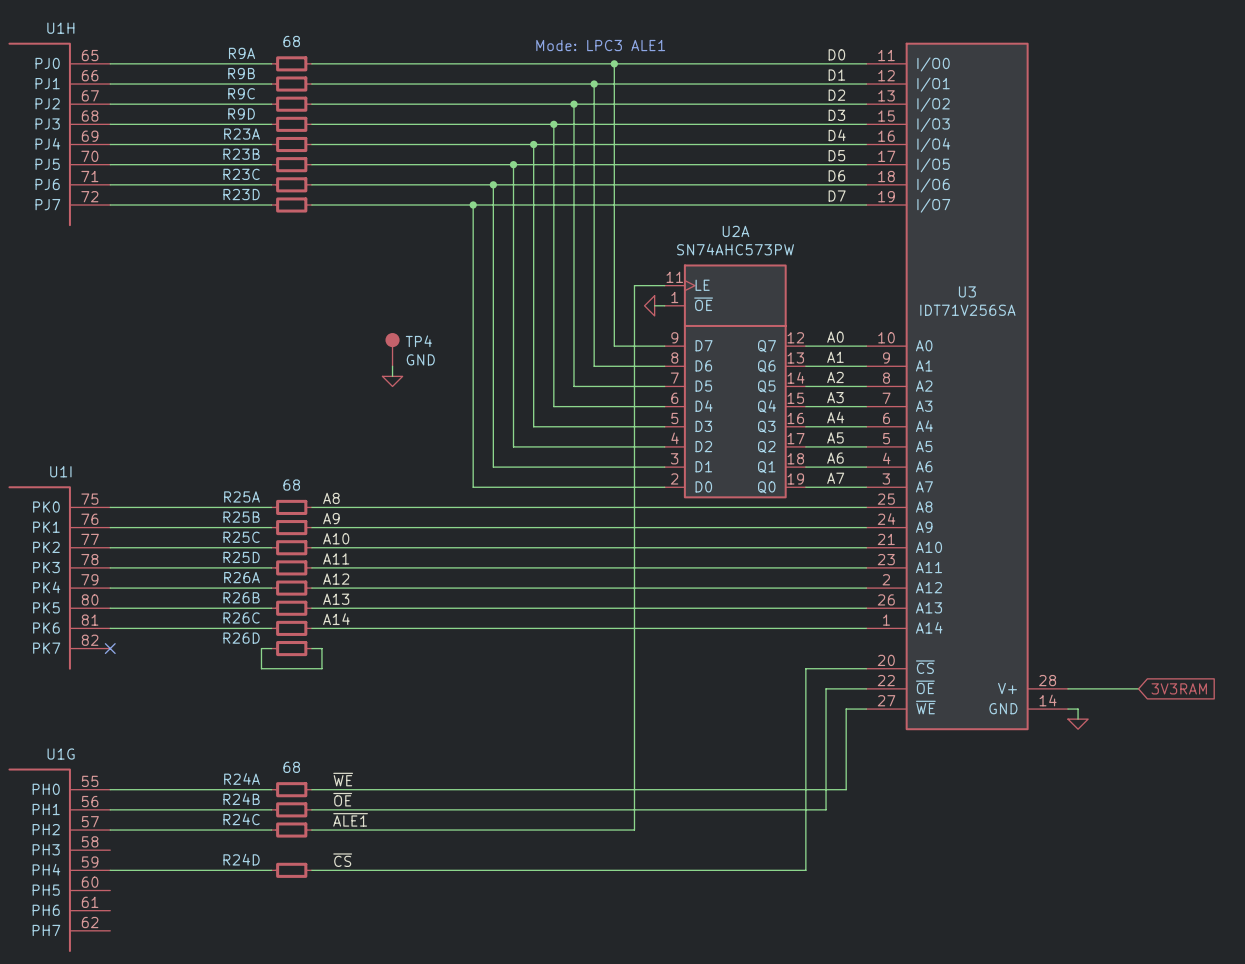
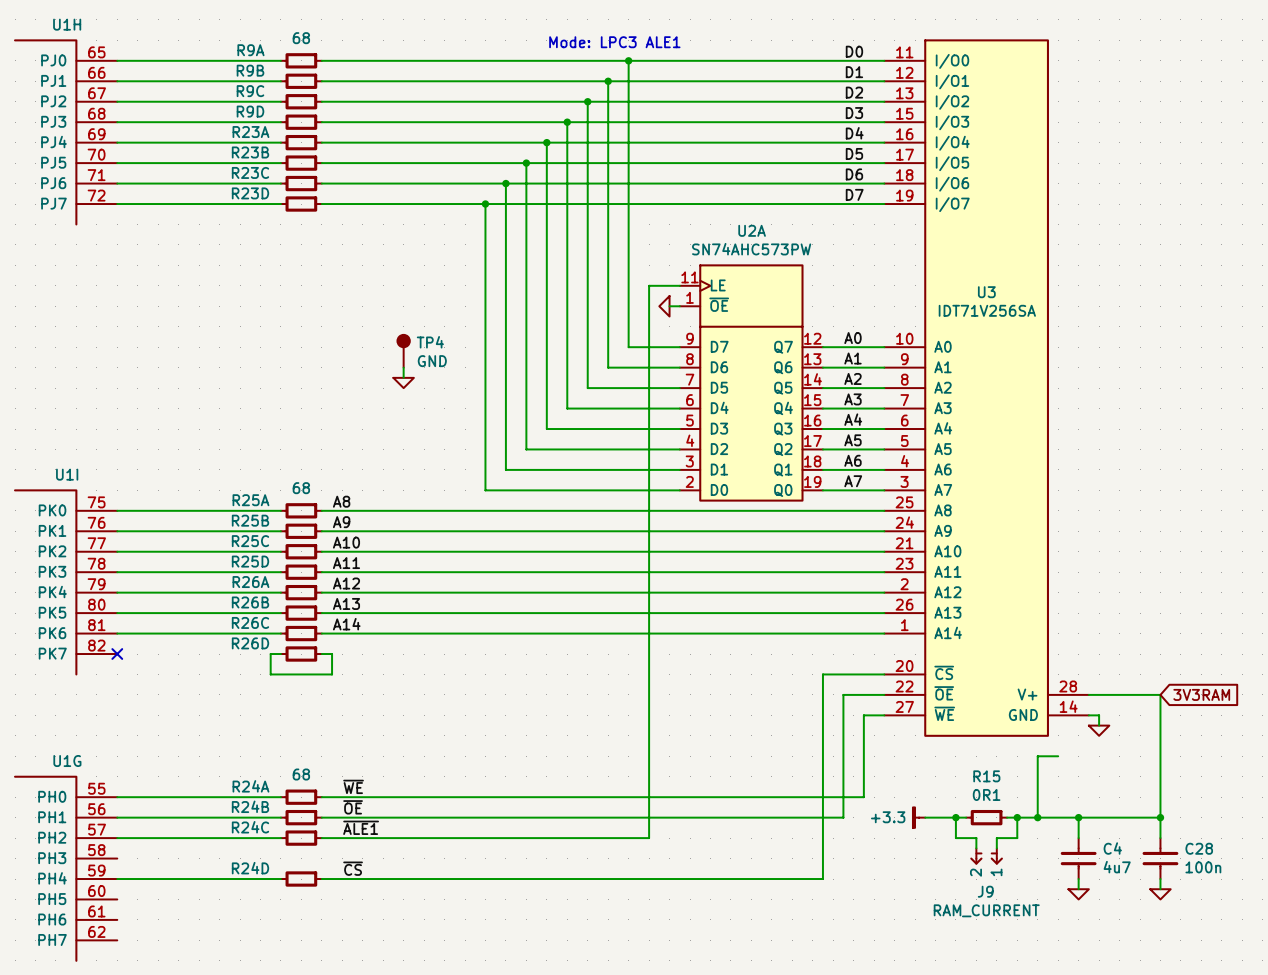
wire: none -> (1160, 694) (1160, 838)
wire: none -> (1058, 756) (1037, 756) (1037, 817)
power symbol: none -> +3.3 (919, 817)
wire: none -> (925, 817) (966, 817)
wire: none -> (955, 817) (955, 838) (976, 838) (976, 848)
junction: none -> (955, 817)
R15: none -> 0R1 (986, 817)
wire: none -> (1007, 817) (1160, 817)
wire: none -> (1017, 817) (1017, 838) (996, 838) (996, 848)
junction: none -> (1017, 817)
junction: none -> (1037, 817)
wire: none -> (1078, 817) (1078, 838)
junction: none -> (1078, 817)
junction: none -> (1160, 817)
J9: none -> RAM_CURRENT (986, 856)
C4: none -> 4u7 (1078, 858)
C28: none -> 100n (1160, 858)
wire: none -> (1078, 879) (1078, 889)
wire: none -> (1160, 879) (1160, 889)
power symbol: none -> (1078, 894)
power symbol: none -> (1160, 894)

